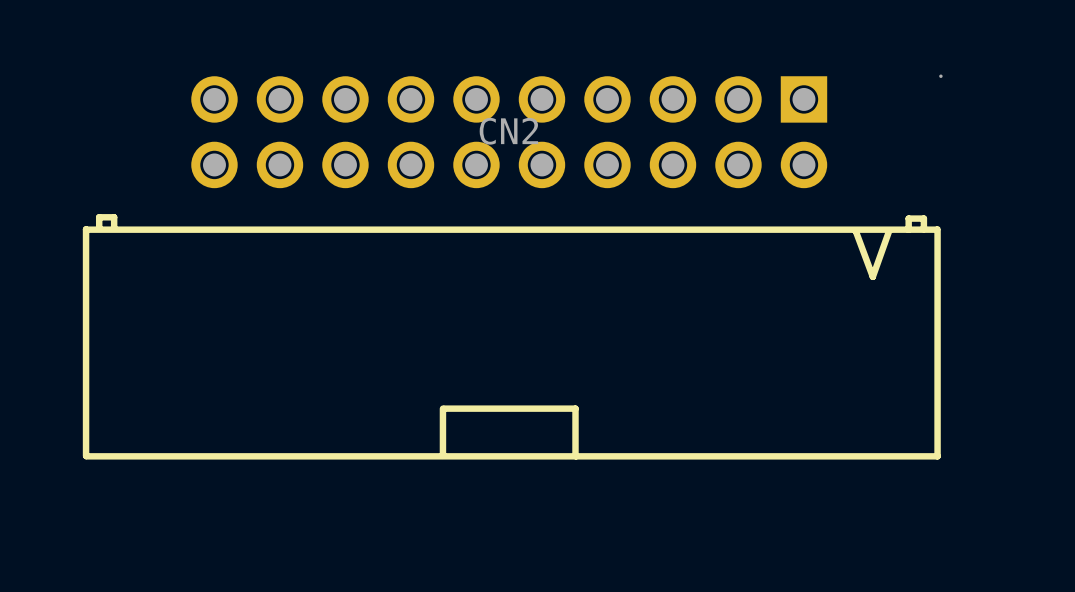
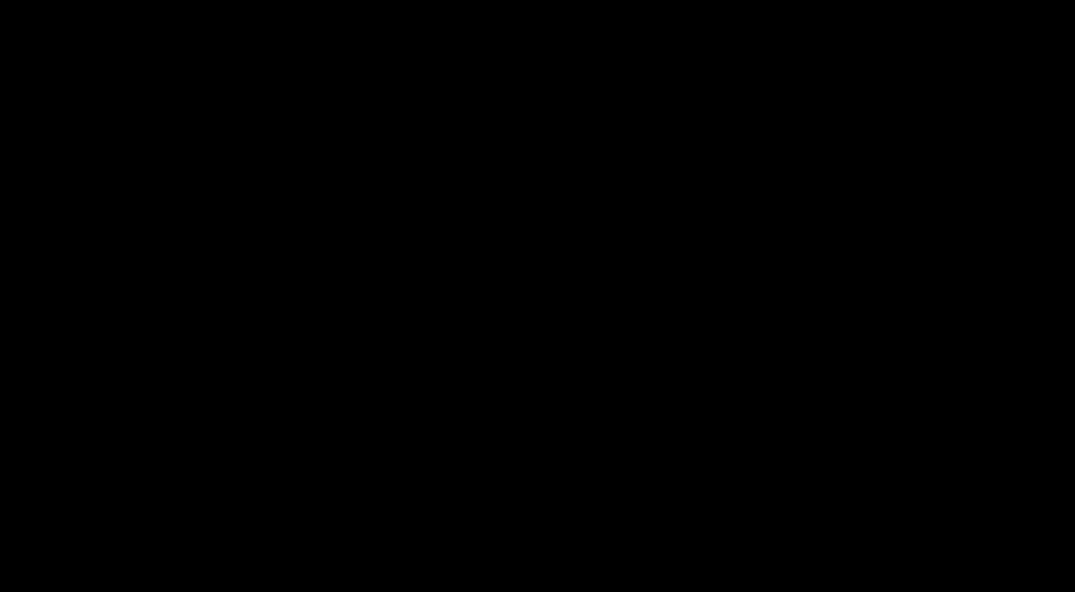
CN2: (512, 267) -> none

